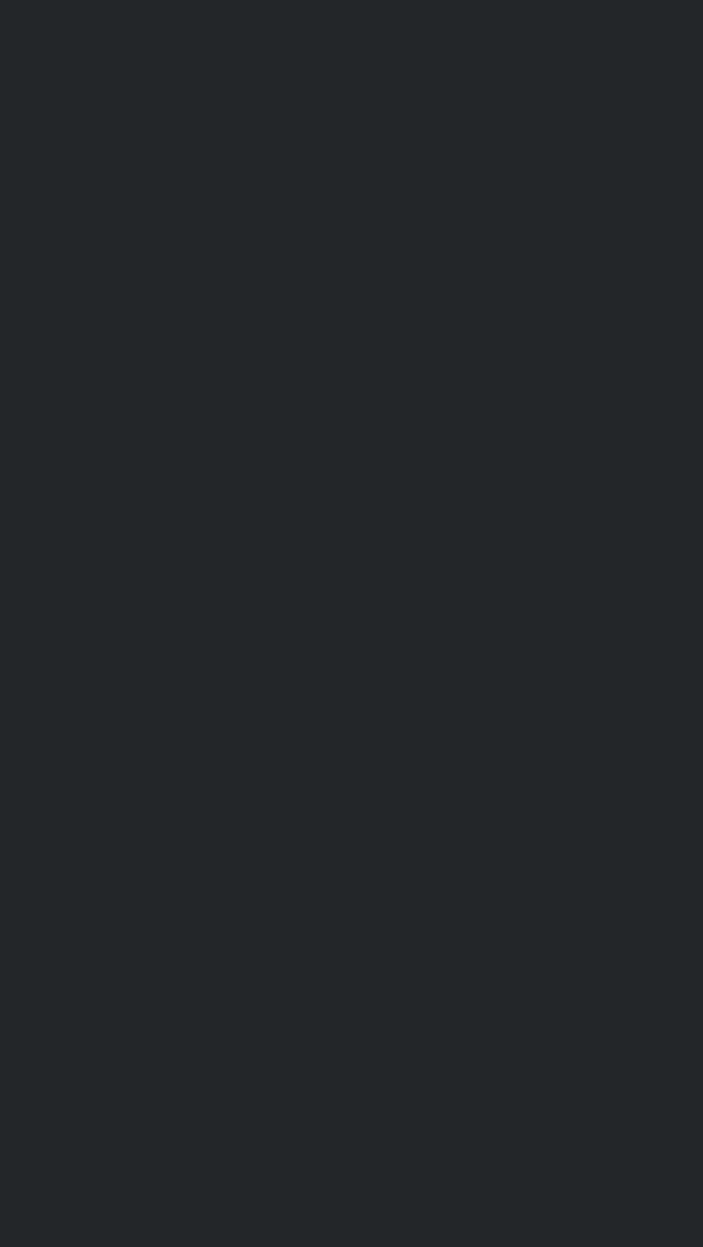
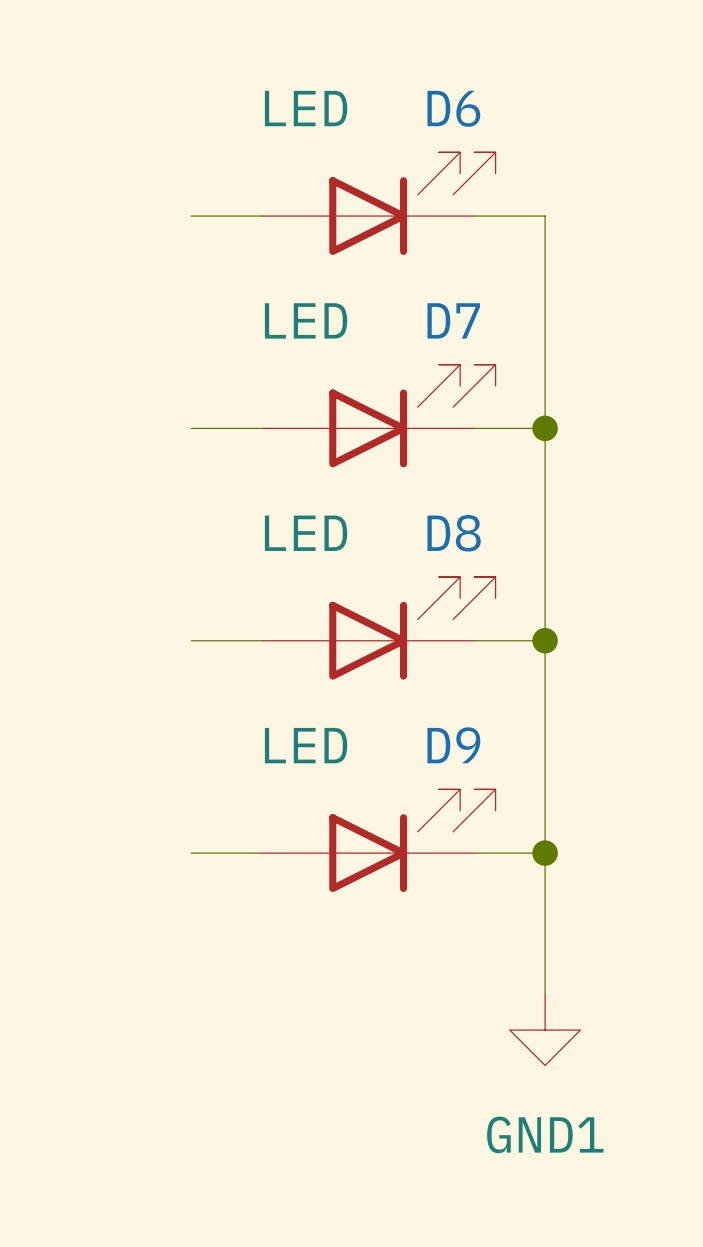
D6: none -> LED (378, 203)
wire: none -> (191, 216) (261, 216)
wire: none -> (474, 216) (545, 216) (545, 994)
D7: none -> LED (378, 416)
wire: none -> (191, 428) (261, 428)
wire: none -> (474, 428) (545, 428)
junction: none -> (545, 428)
D8: none -> LED (378, 628)
wire: none -> (191, 640) (261, 640)
wire: none -> (474, 640) (545, 640)
junction: none -> (545, 640)
D9: none -> LED (378, 840)
wire: none -> (191, 853) (261, 853)
wire: none -> (474, 853) (545, 853)
junction: none -> (545, 853)
power symbol: none -> GND1 (545, 1030)

